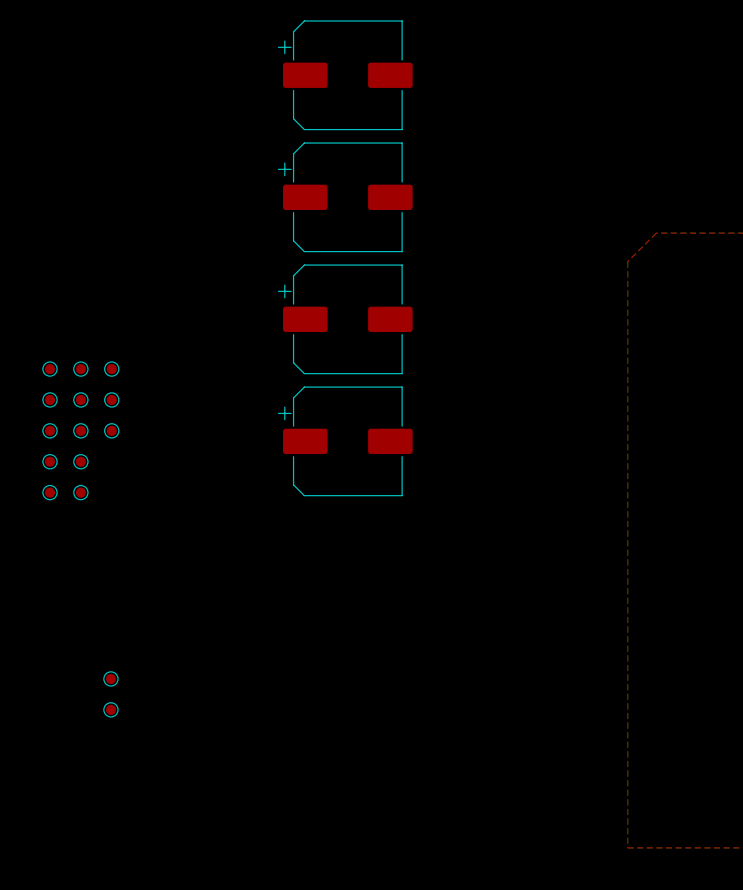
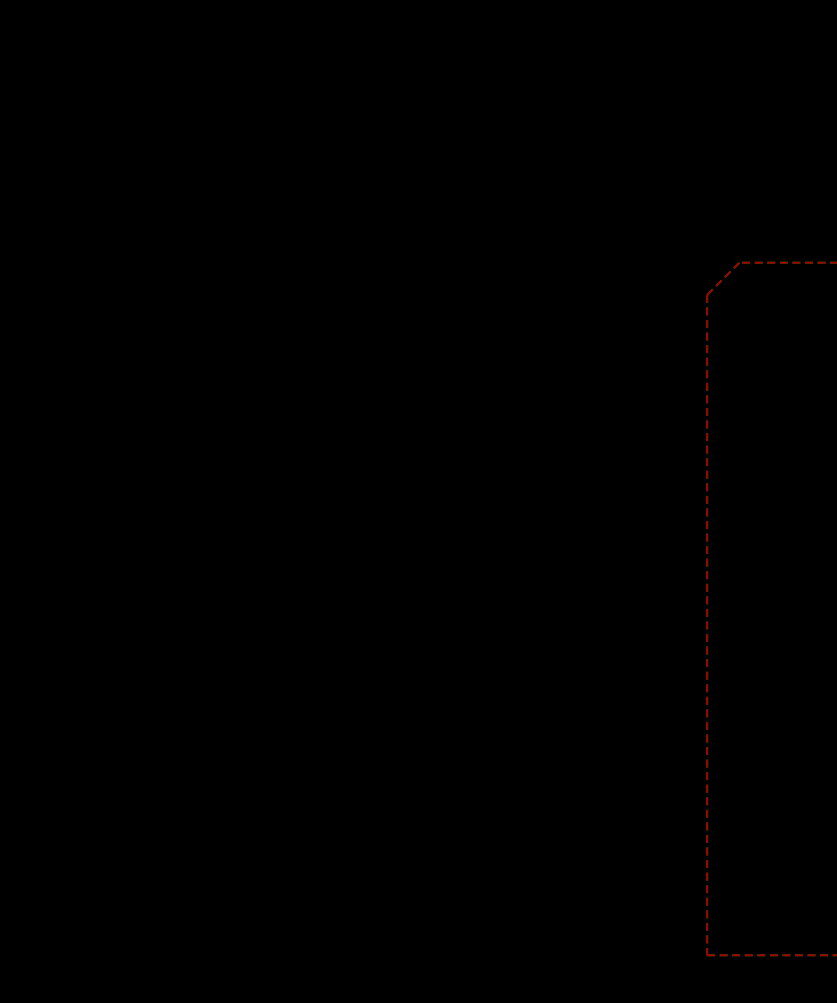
part: (345, 75) -> none
part: (345, 197) -> none
part: (345, 319) -> none
part: (49, 369) -> none
part: (80, 369) -> none
part: (111, 369) -> none
part: (49, 399) -> none
part: (80, 399) -> none
part: (111, 399) -> none
part: (49, 430) -> none
part: (80, 430) -> none
part: (111, 430) -> none
part: (345, 441) -> none
part: (49, 461) -> none
part: (80, 461) -> none
part: (49, 492) -> none
part: (80, 492) -> none
part: (110, 678) -> none
part: (110, 709) -> none

